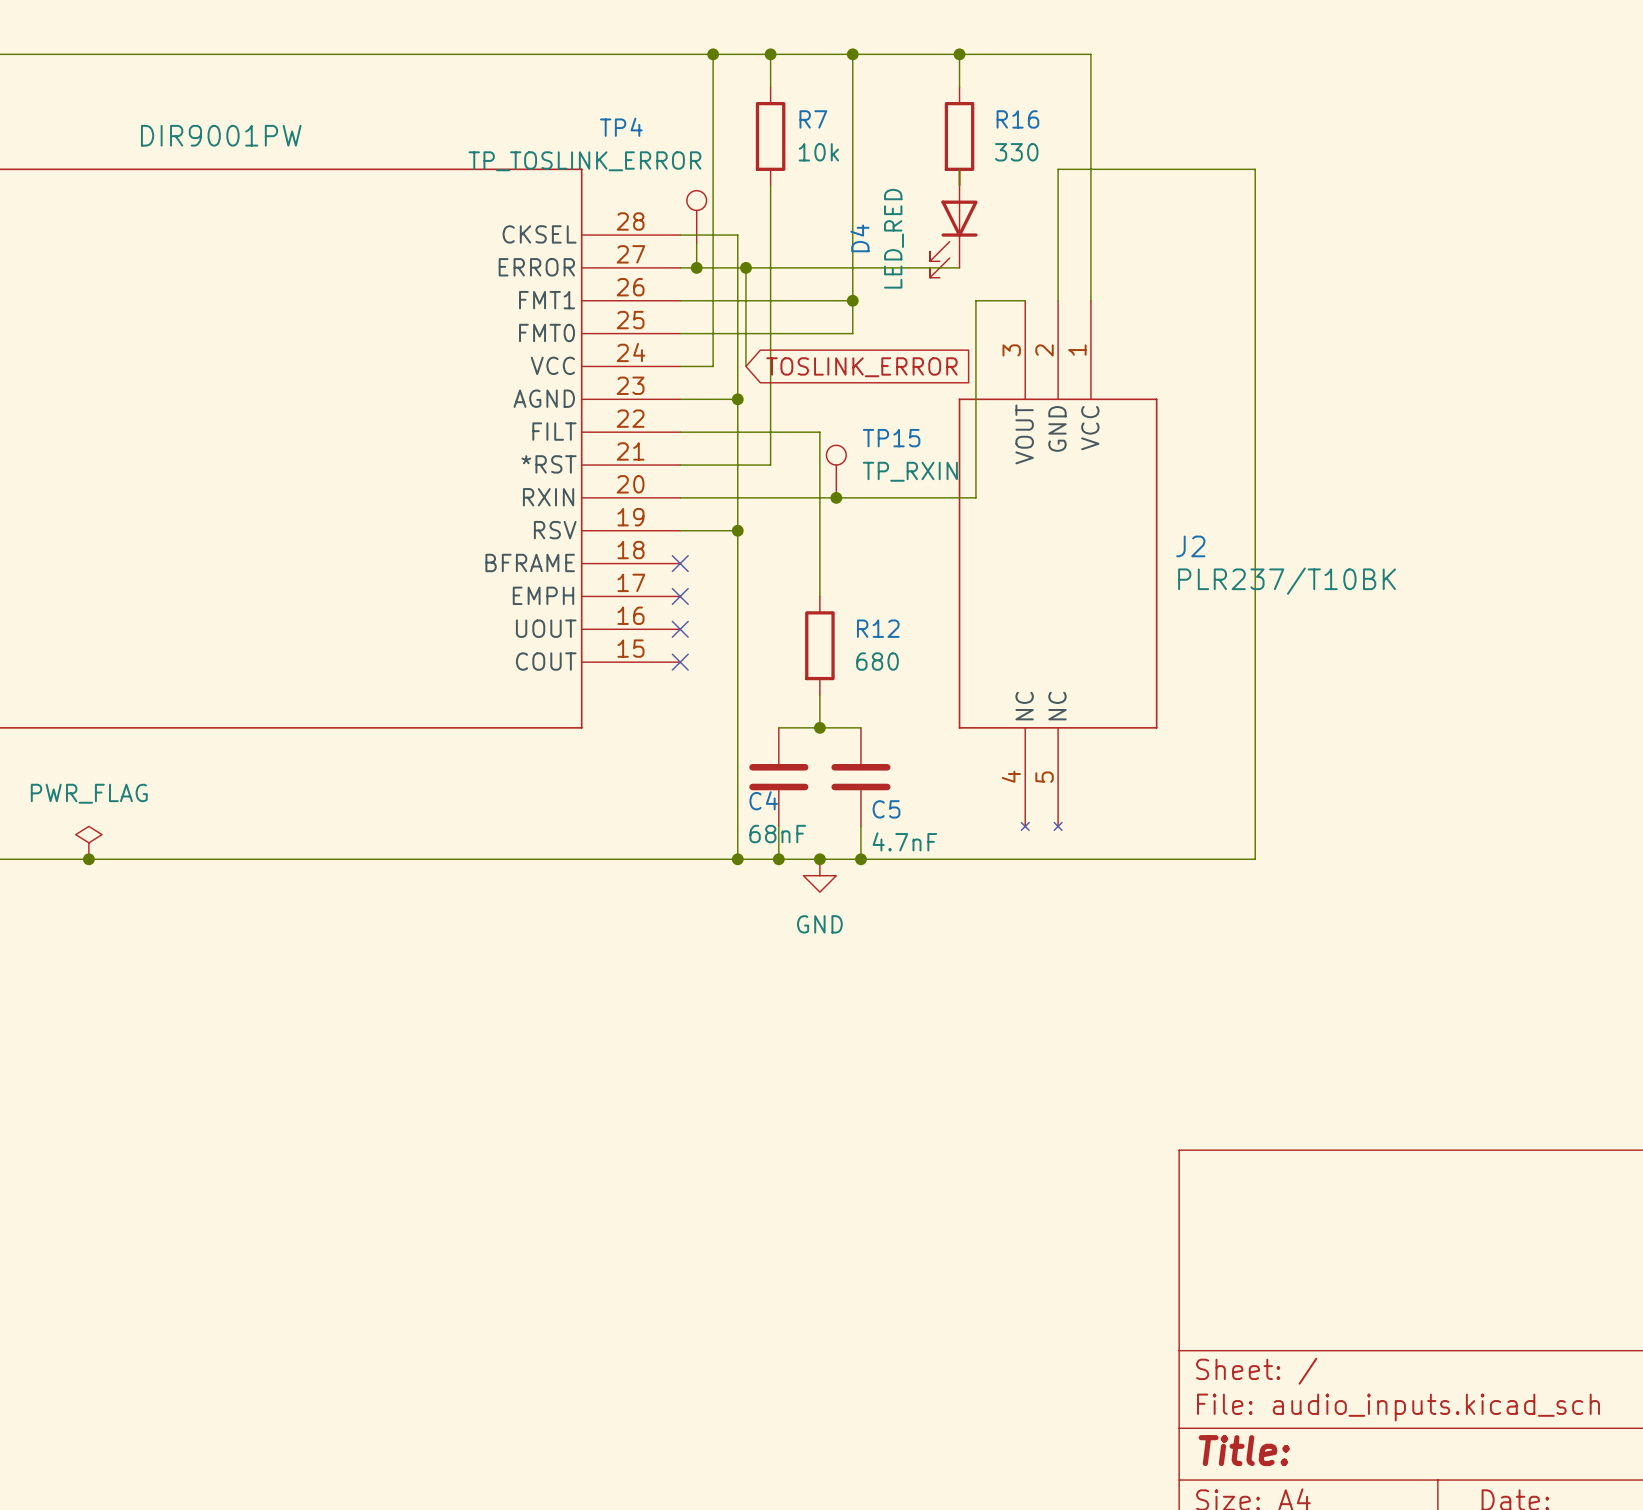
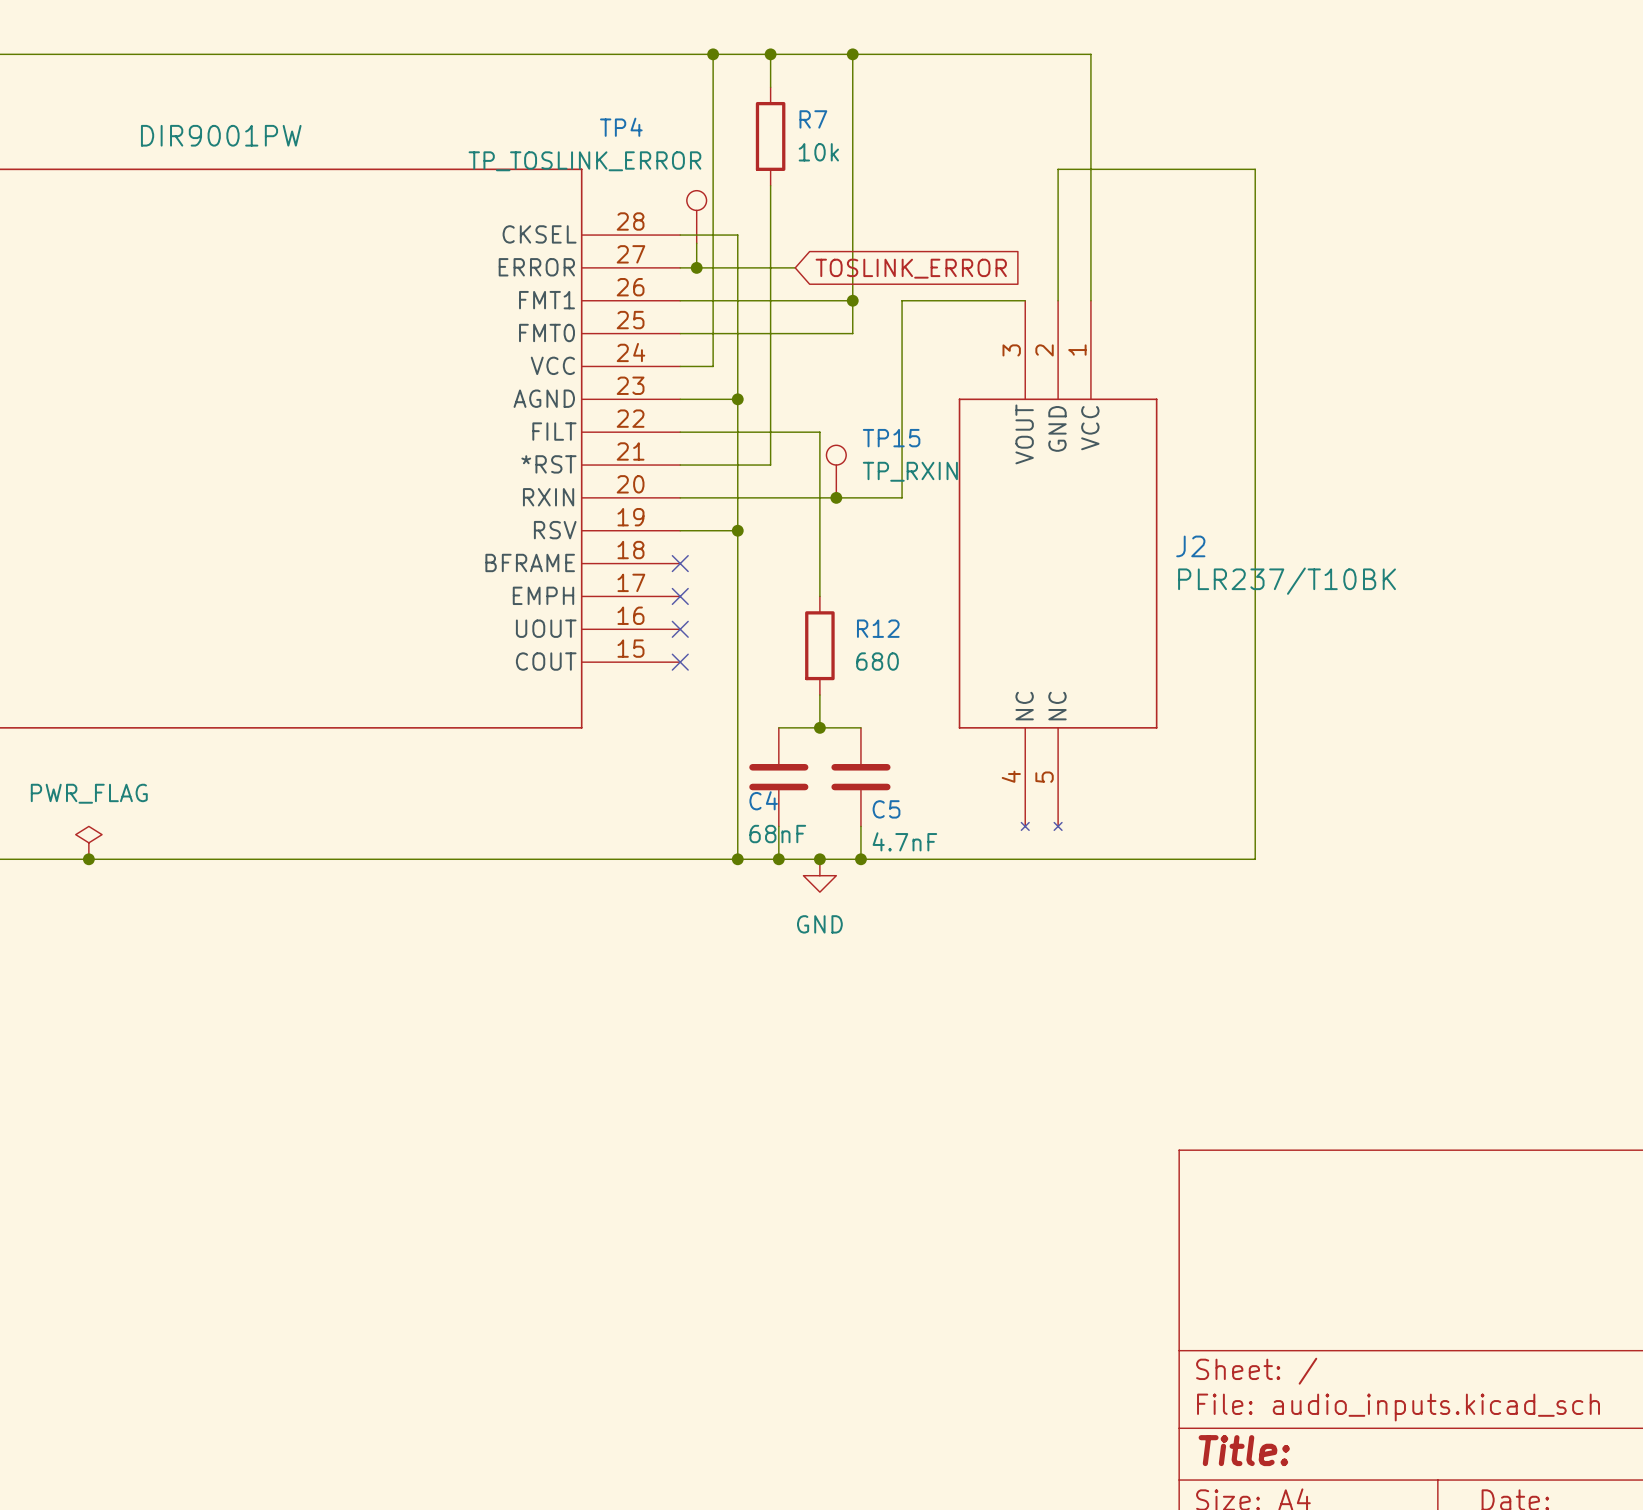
wire: (959, 54) (959, 87) -> none
junction: (959, 54) -> none
R16: 330 (959, 136) -> none
wire: (959, 169) (959, 185) -> none
D4: LED_RED (953, 223) -> none
wire: (745, 267) (745, 366) -> none
junction: (745, 267) -> none
wire: (795, 267) (959, 267) -> none
wire: (975, 300) (975, 497) (902, 497) -> (975, 300) (902, 300) (902, 497)
global label position: TOSLINK_ERROR (861, 367) -> TOSLINK_ERROR (911, 268)

